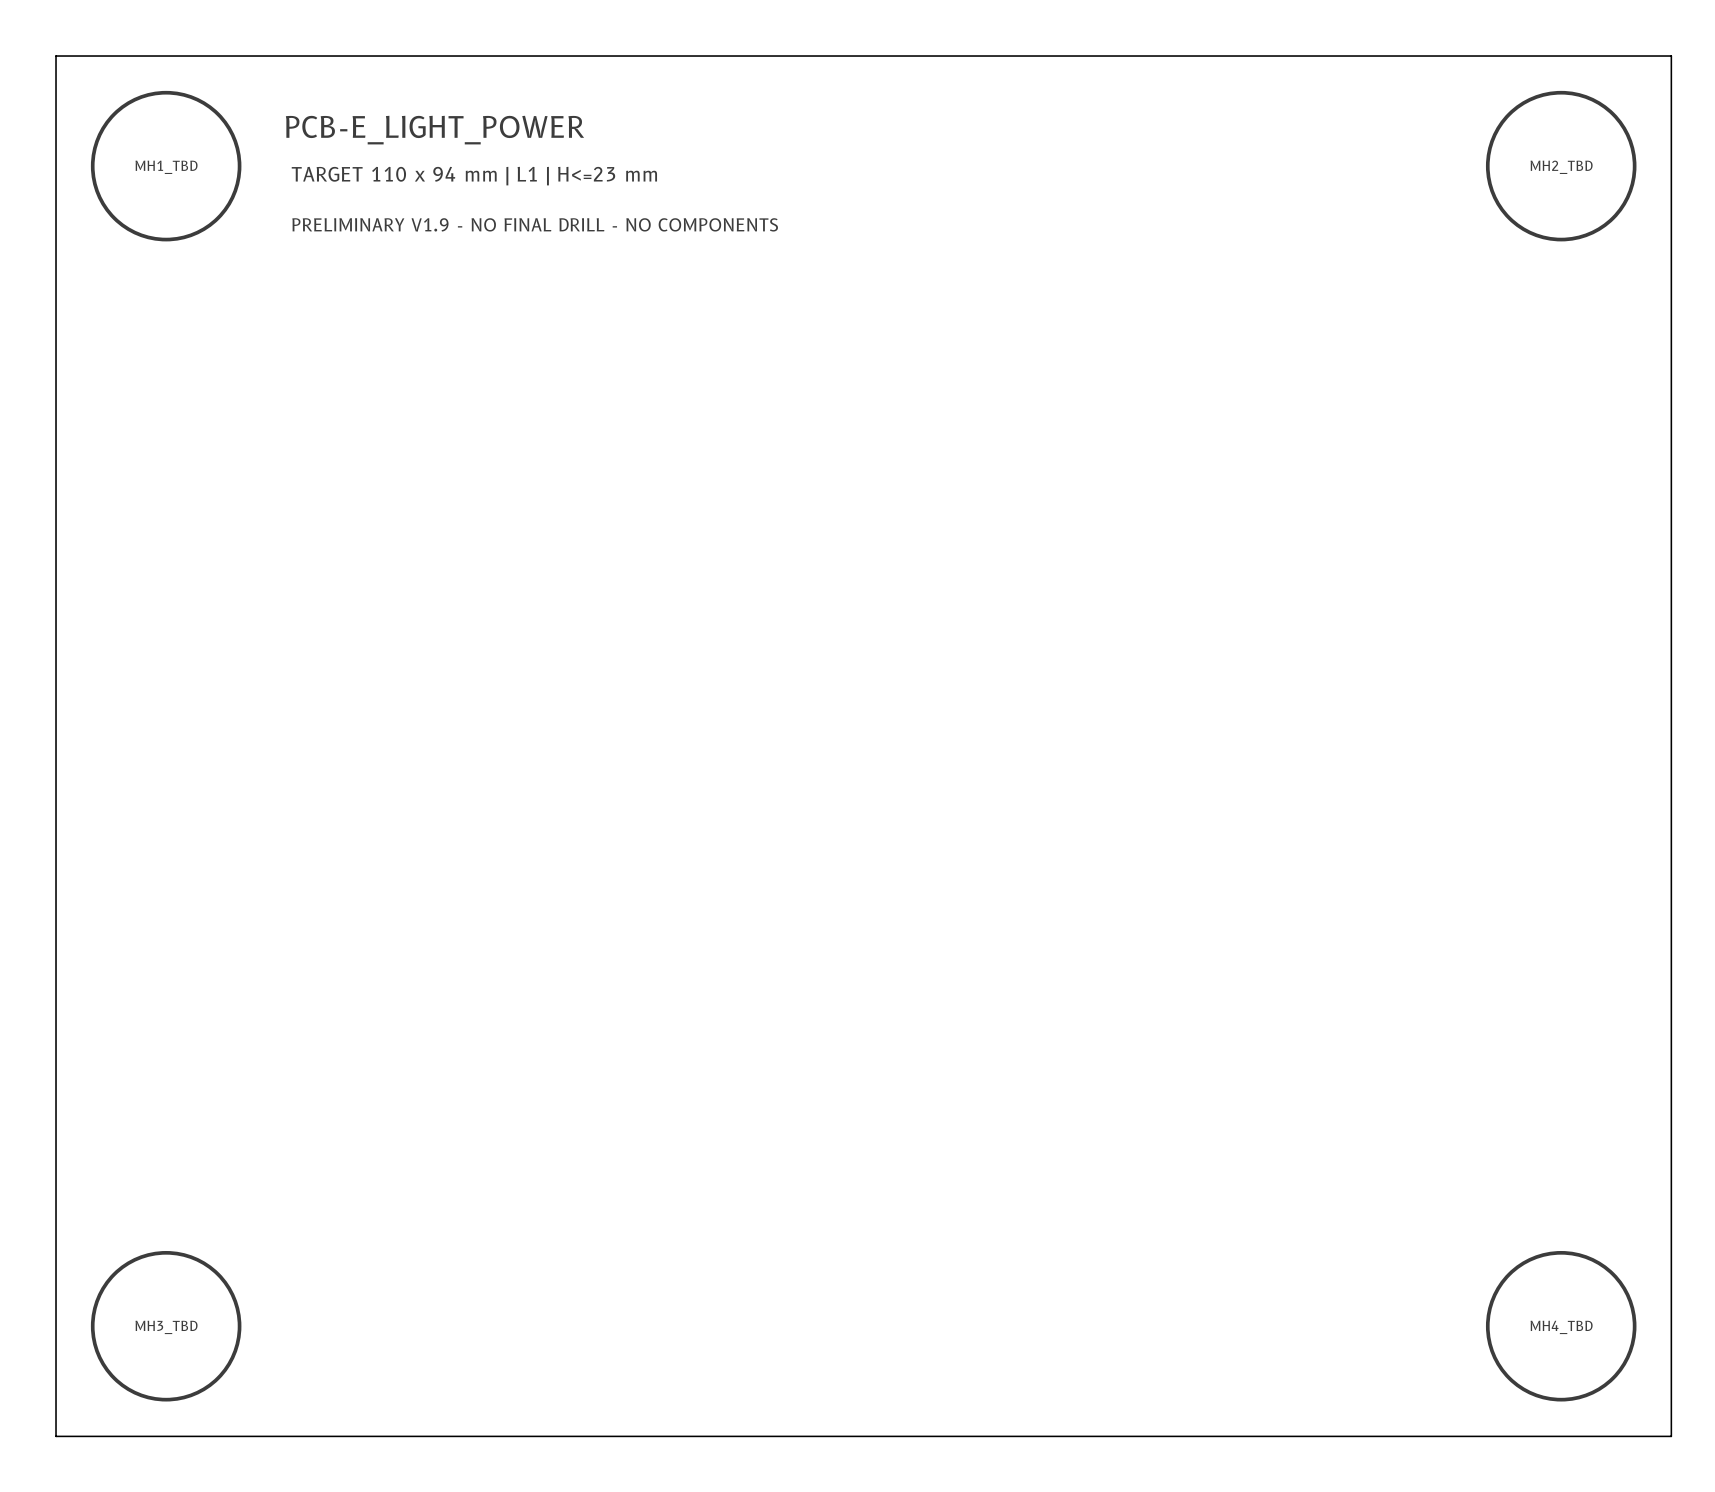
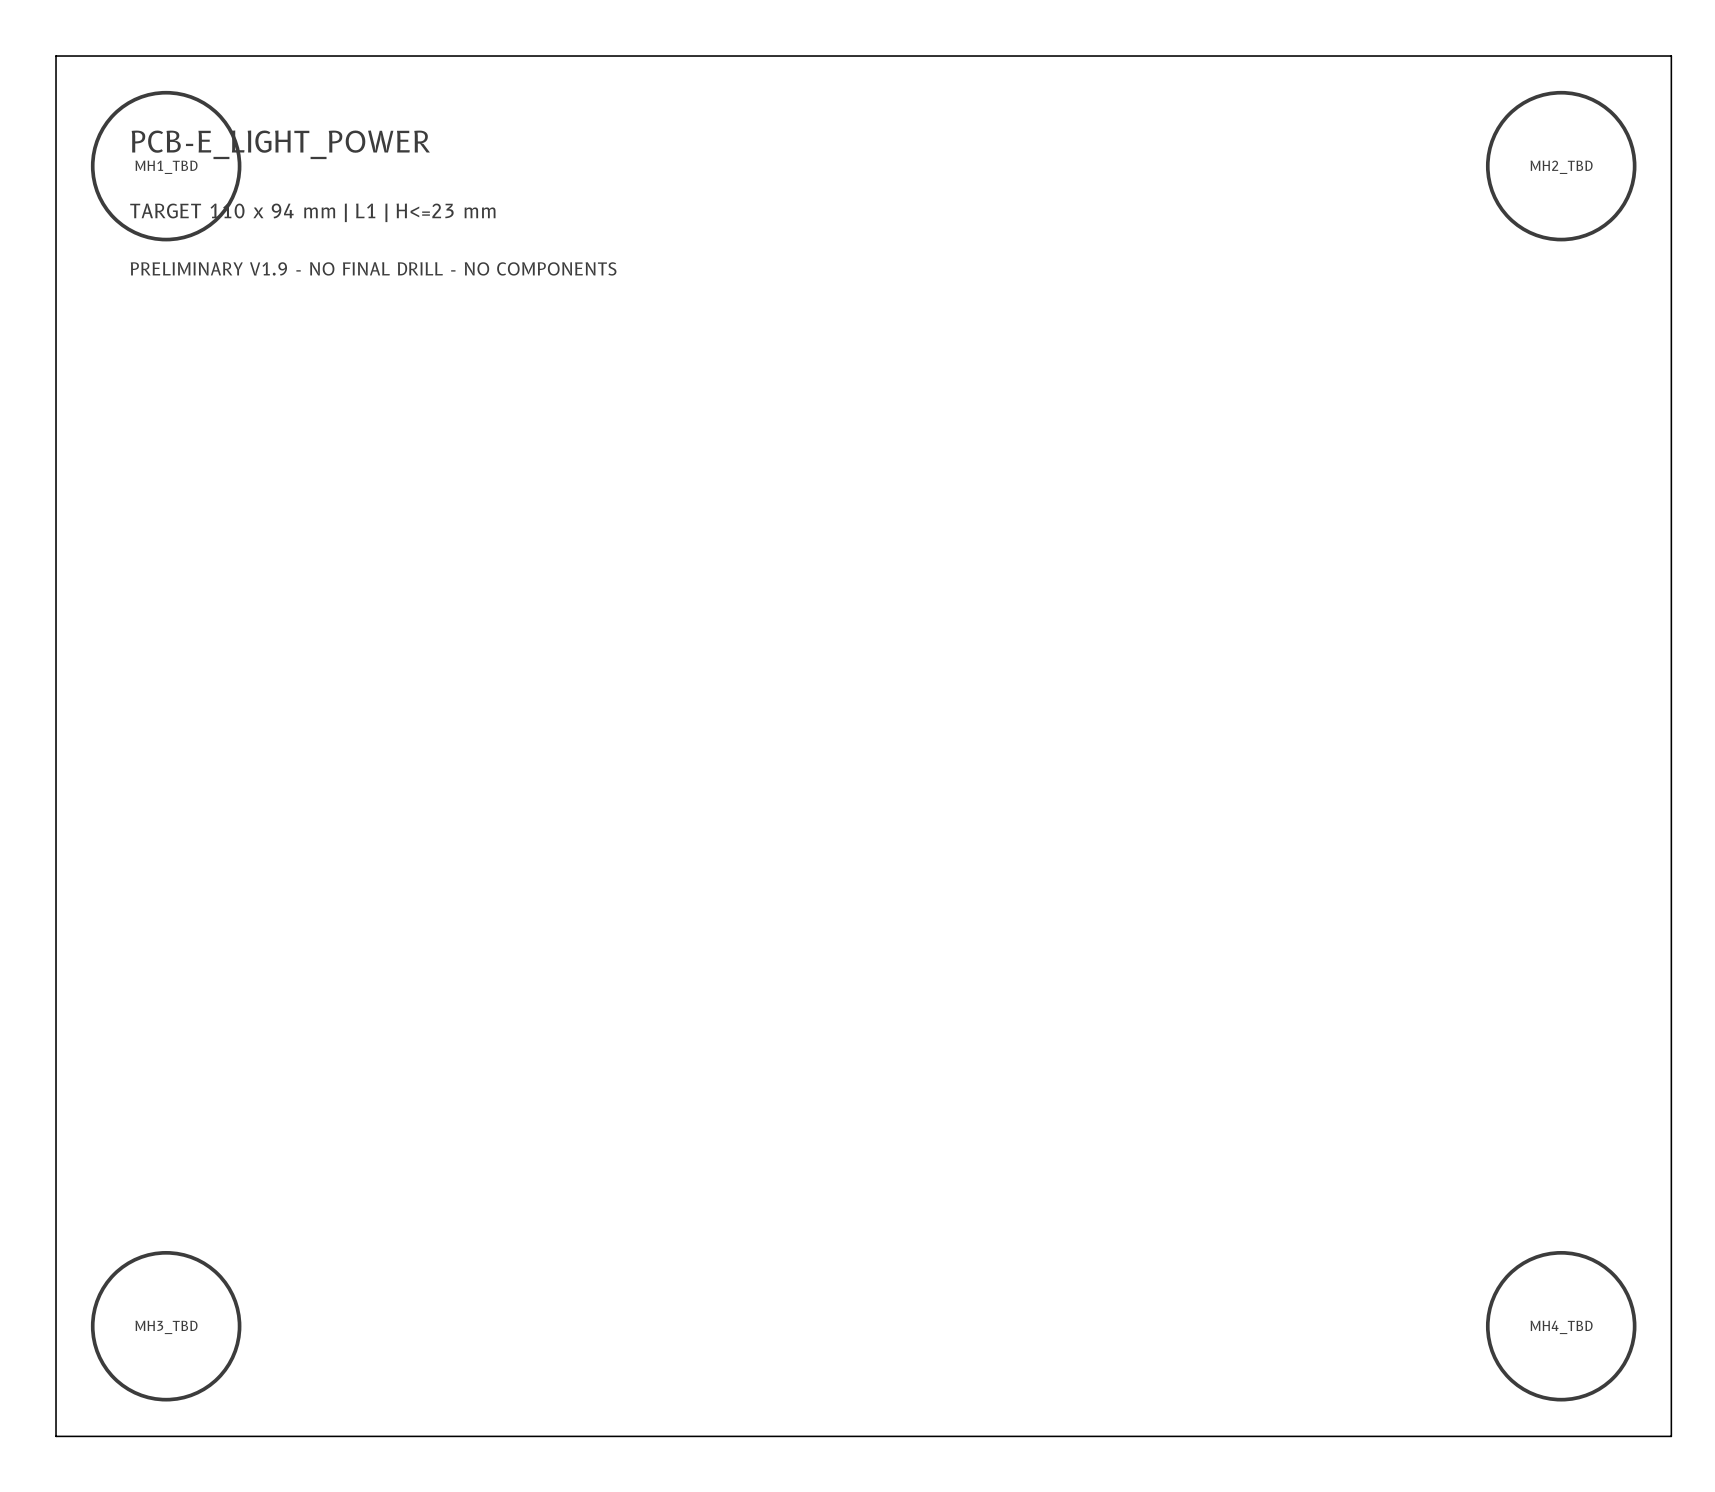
text position: PCB-E_LIGHT_POWER (434, 130) -> PCB-E_LIGHT_POWER (280, 144)
text position: TARGET 110 x 94 mm | L1 | H<=23 mm (474, 176) -> TARGET 110 x 94 mm | L1 | H<=23 mm (312, 212)
text position: PRELIMINARY V1.9 - NO FINAL DRILL - NO COMPONENTS (535, 224) -> PRELIMINARY V1.9 - NO FINAL DRILL - NO COMPONENTS (373, 268)

